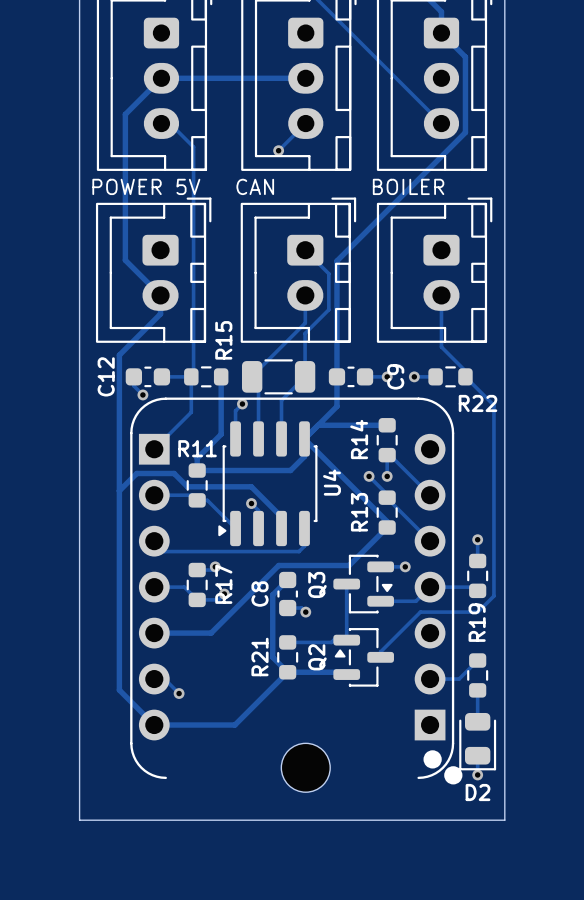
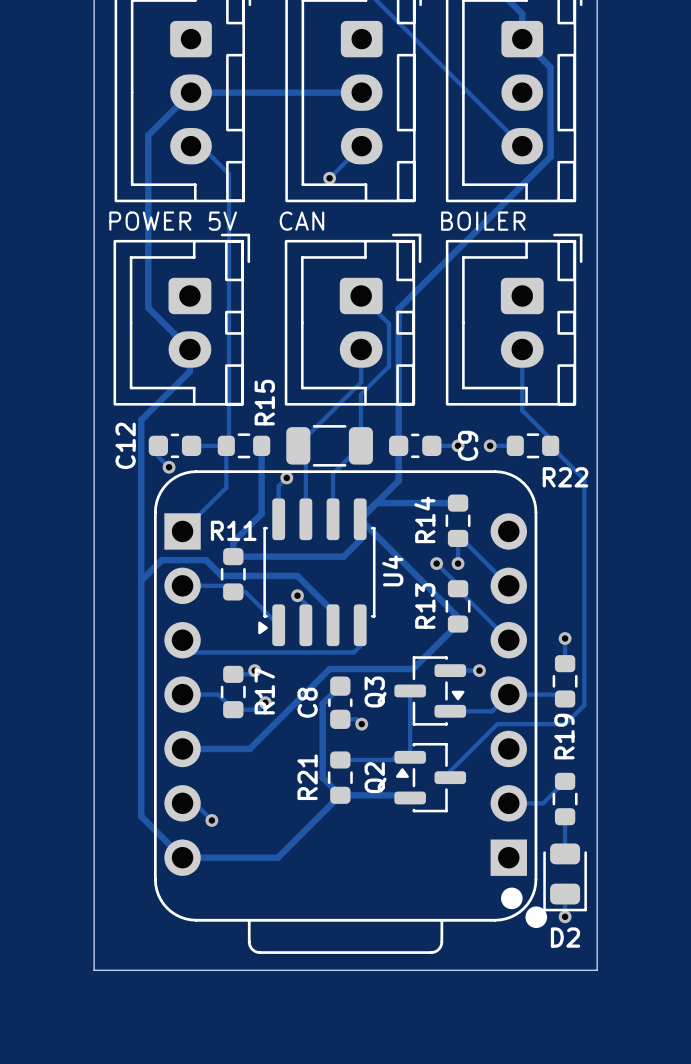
part: (305, 767) -> none
line: none -> (196, 920) (495, 920) (196, 920)
line: none -> (249, 920) (249, 944) (253, 950) (259, 952) (432, 952) (438, 949) (441, 944) (441, 920)

